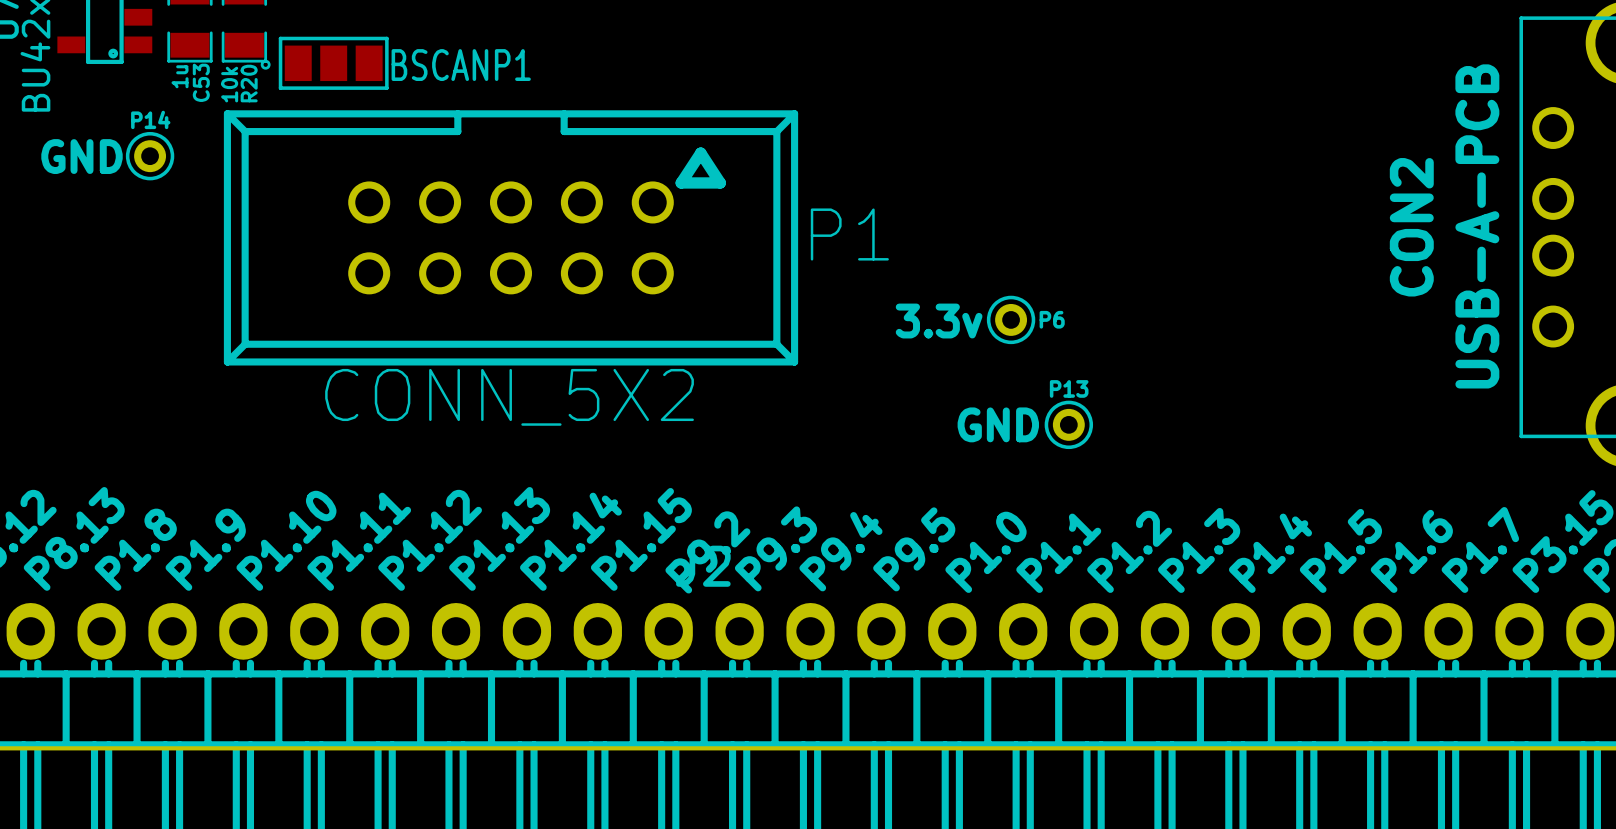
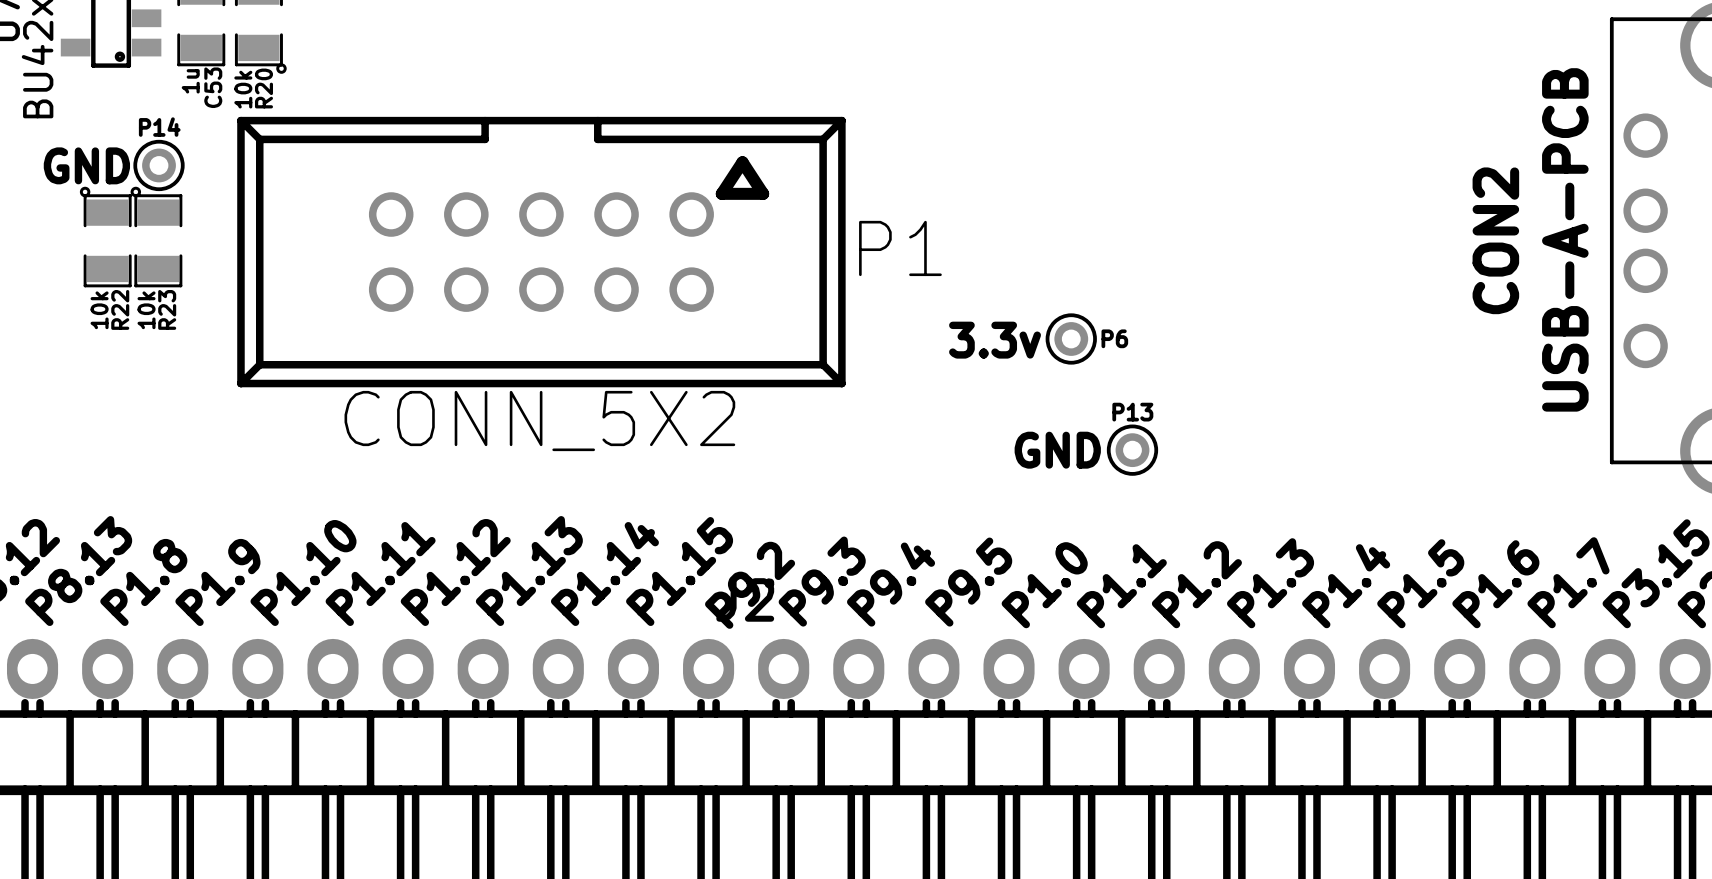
BSCANP1: (333, 63) -> none
R22: none -> 10k (105, 237)
R23: none -> 10k (156, 237)

